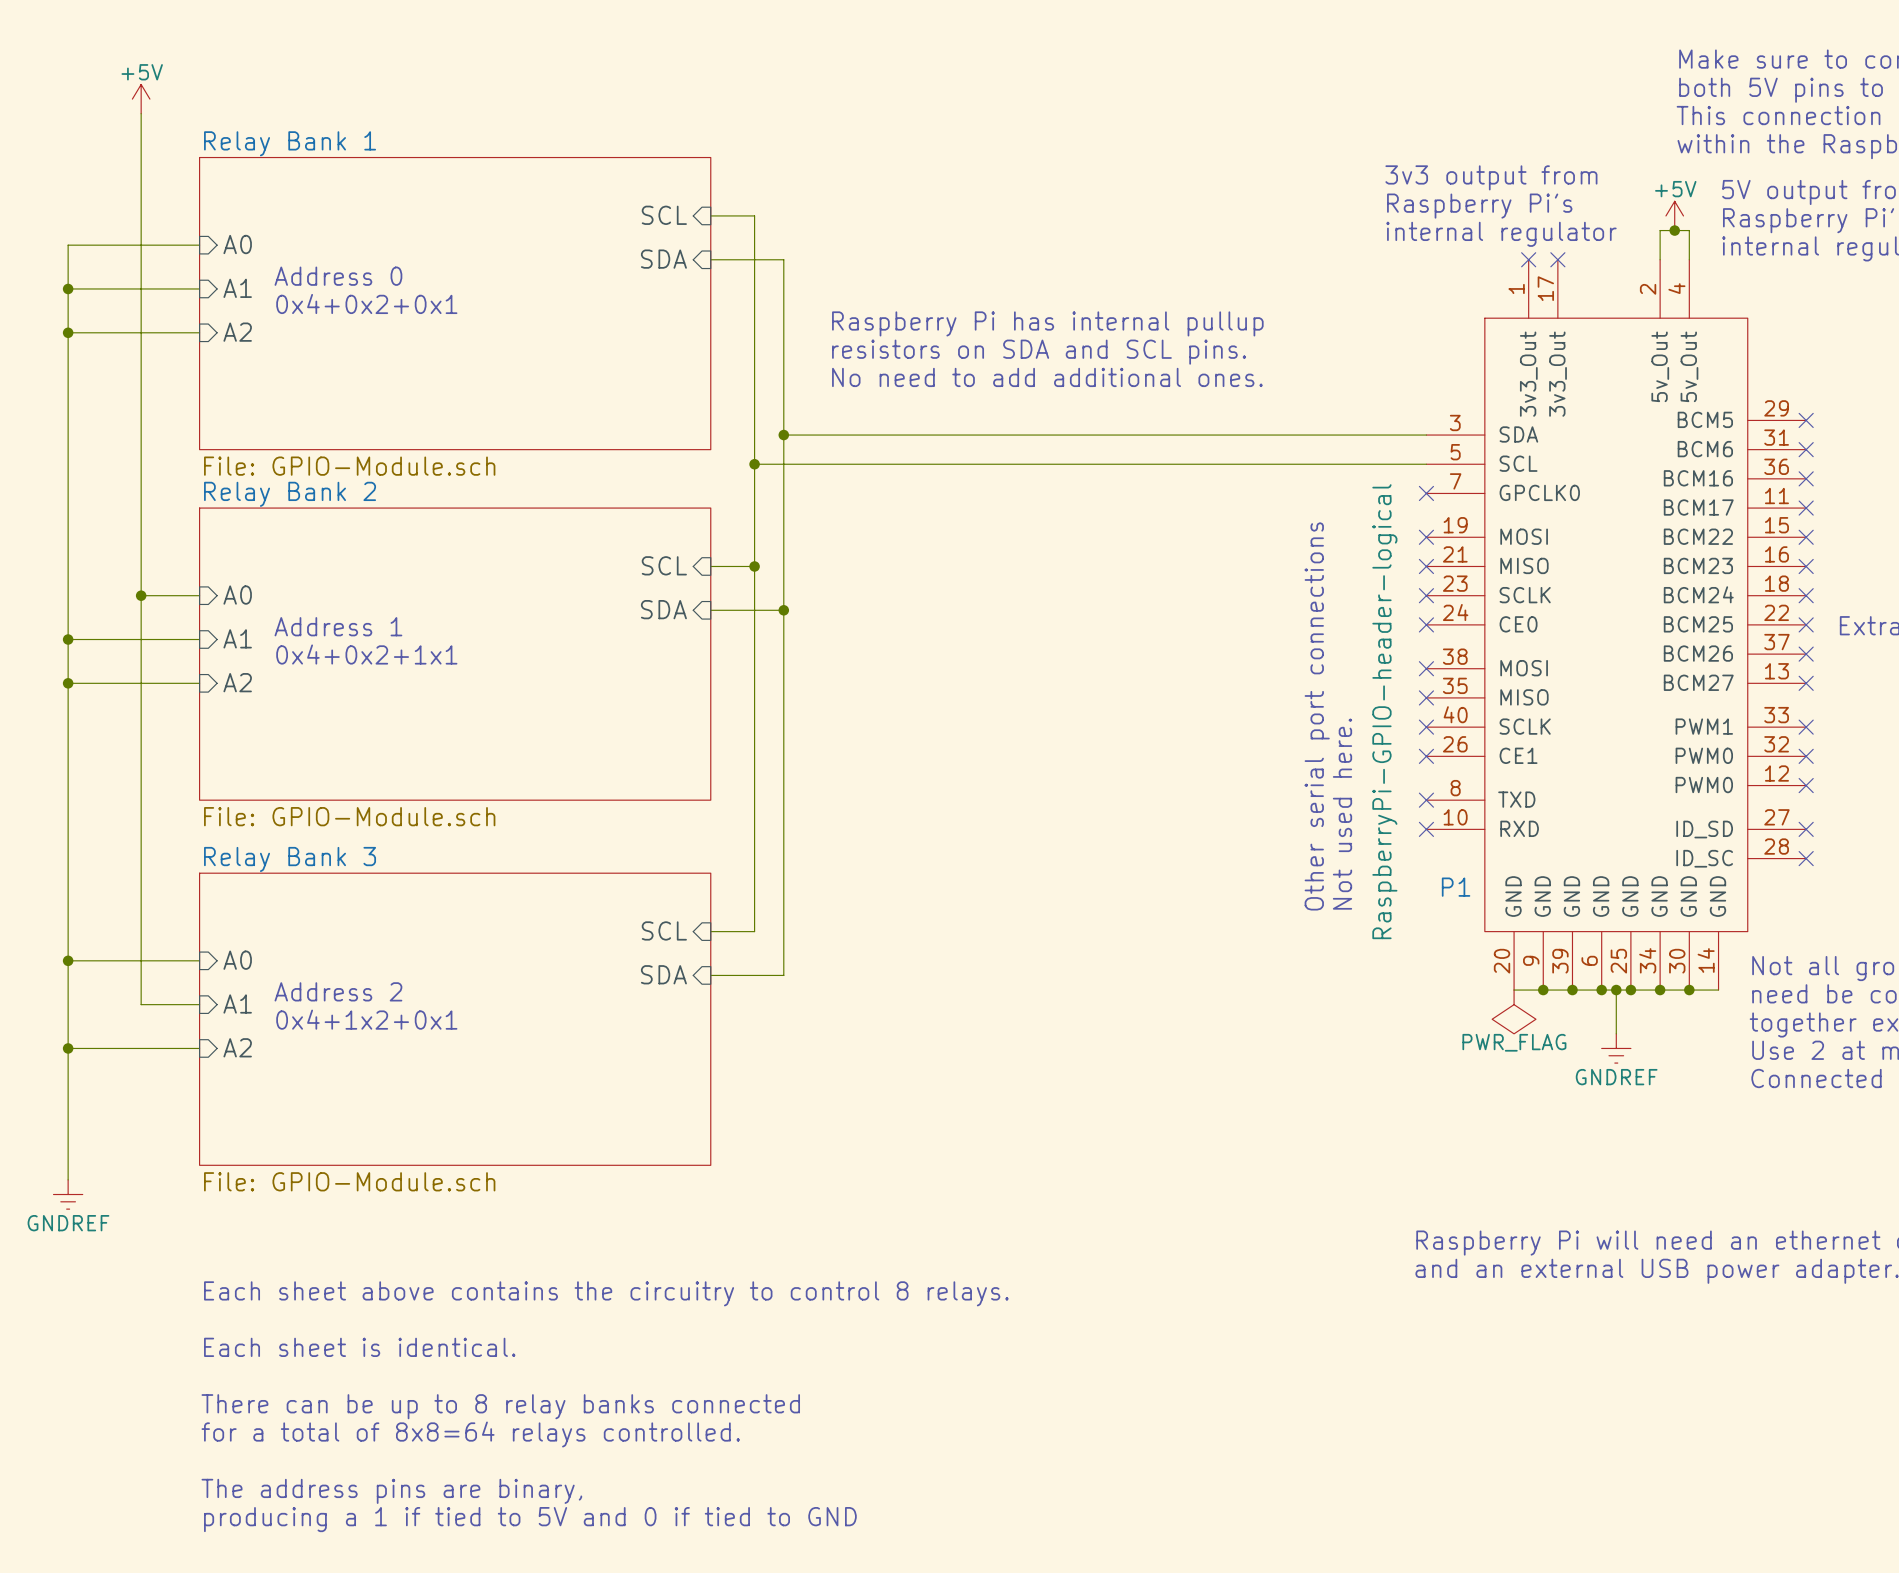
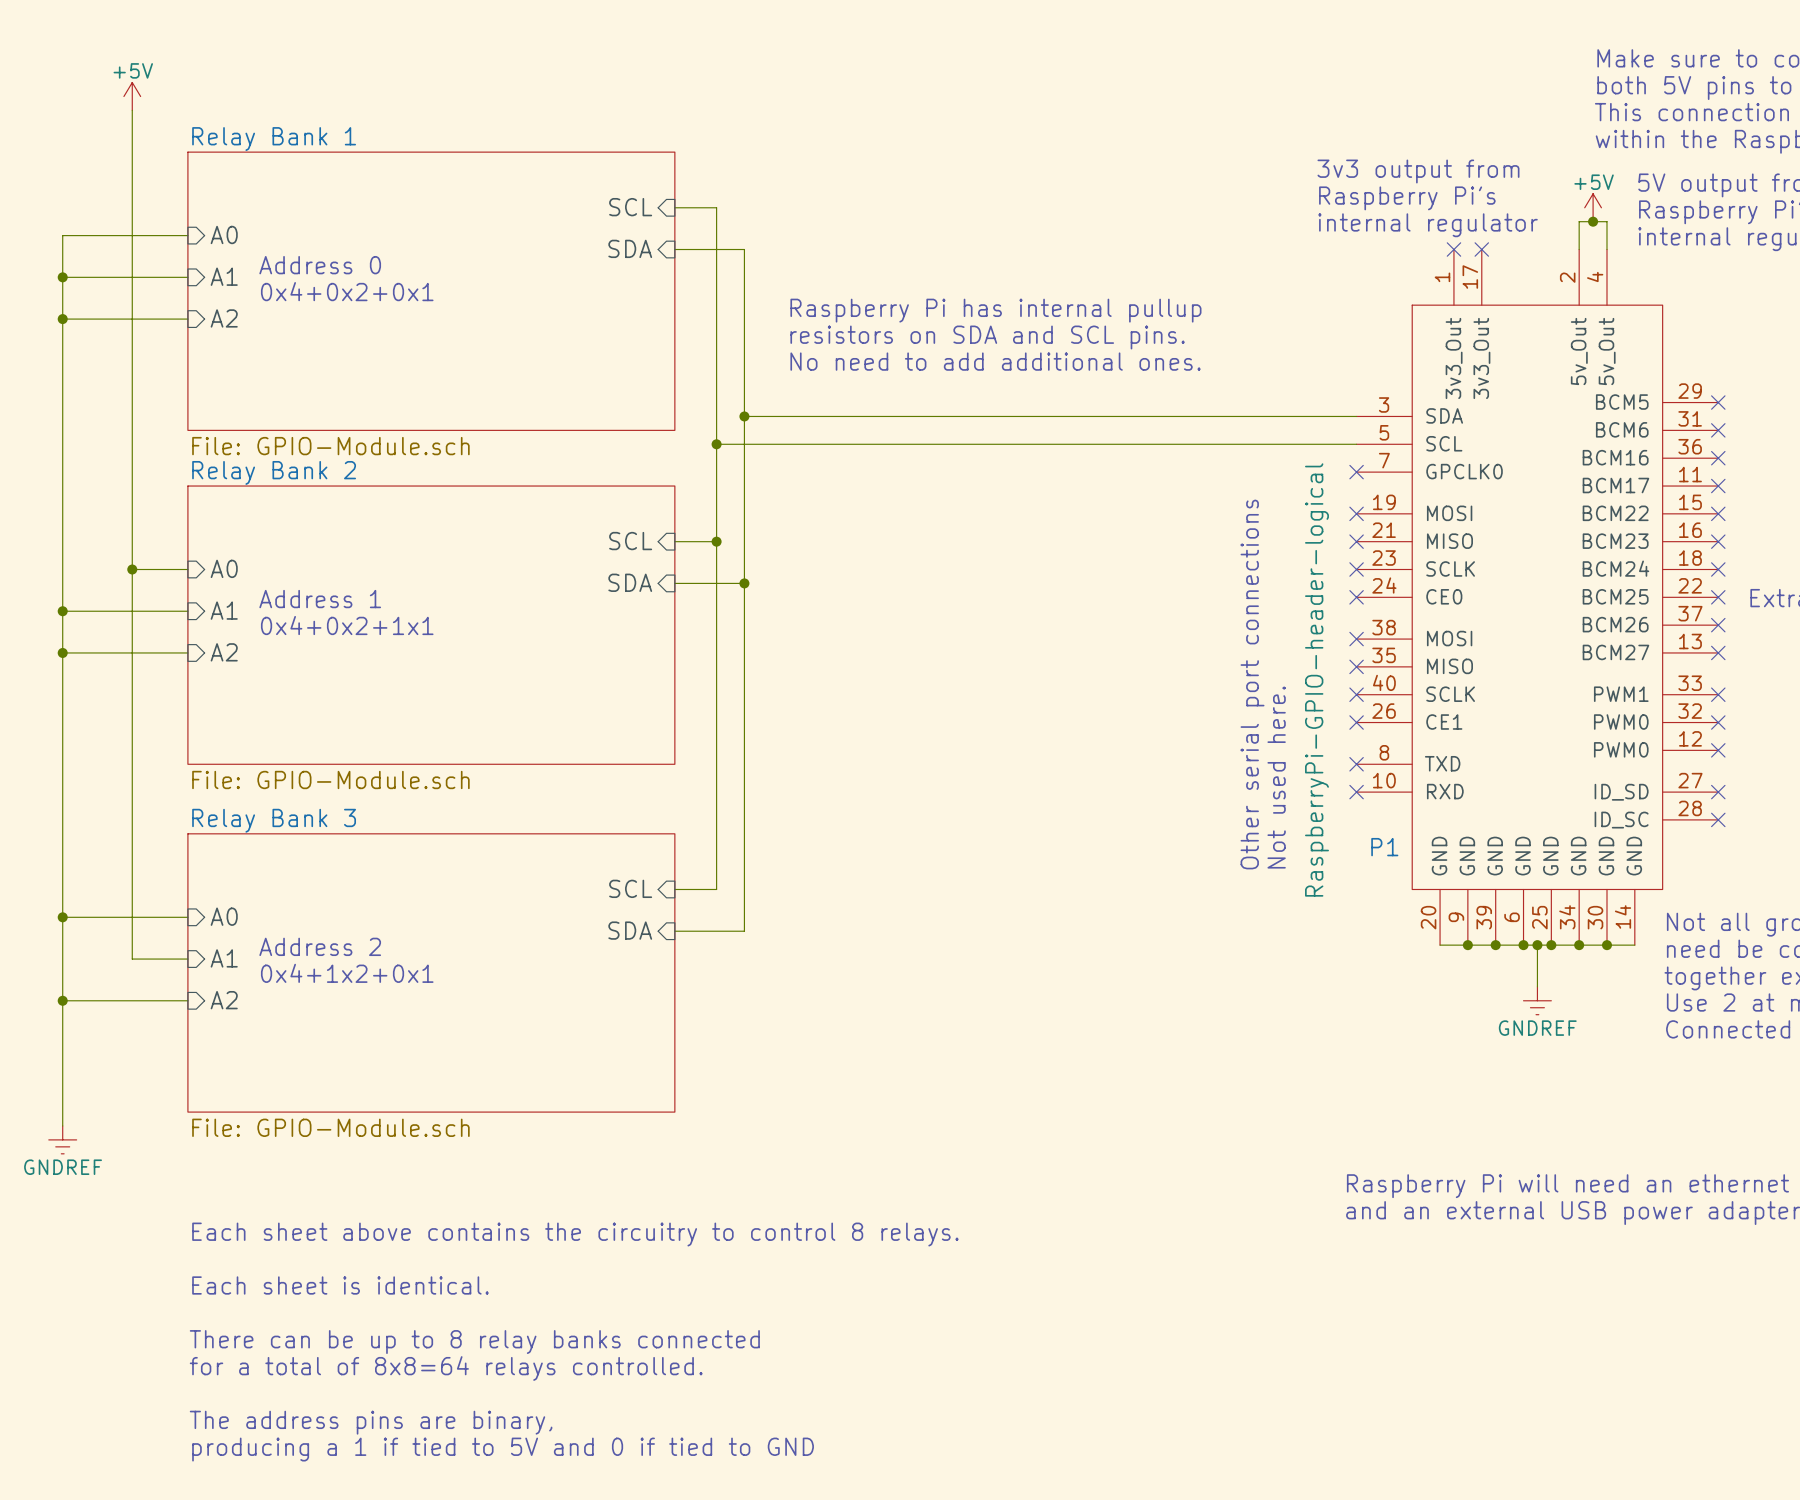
power symbol: PWR_FLAG (1514, 1011) -> none

